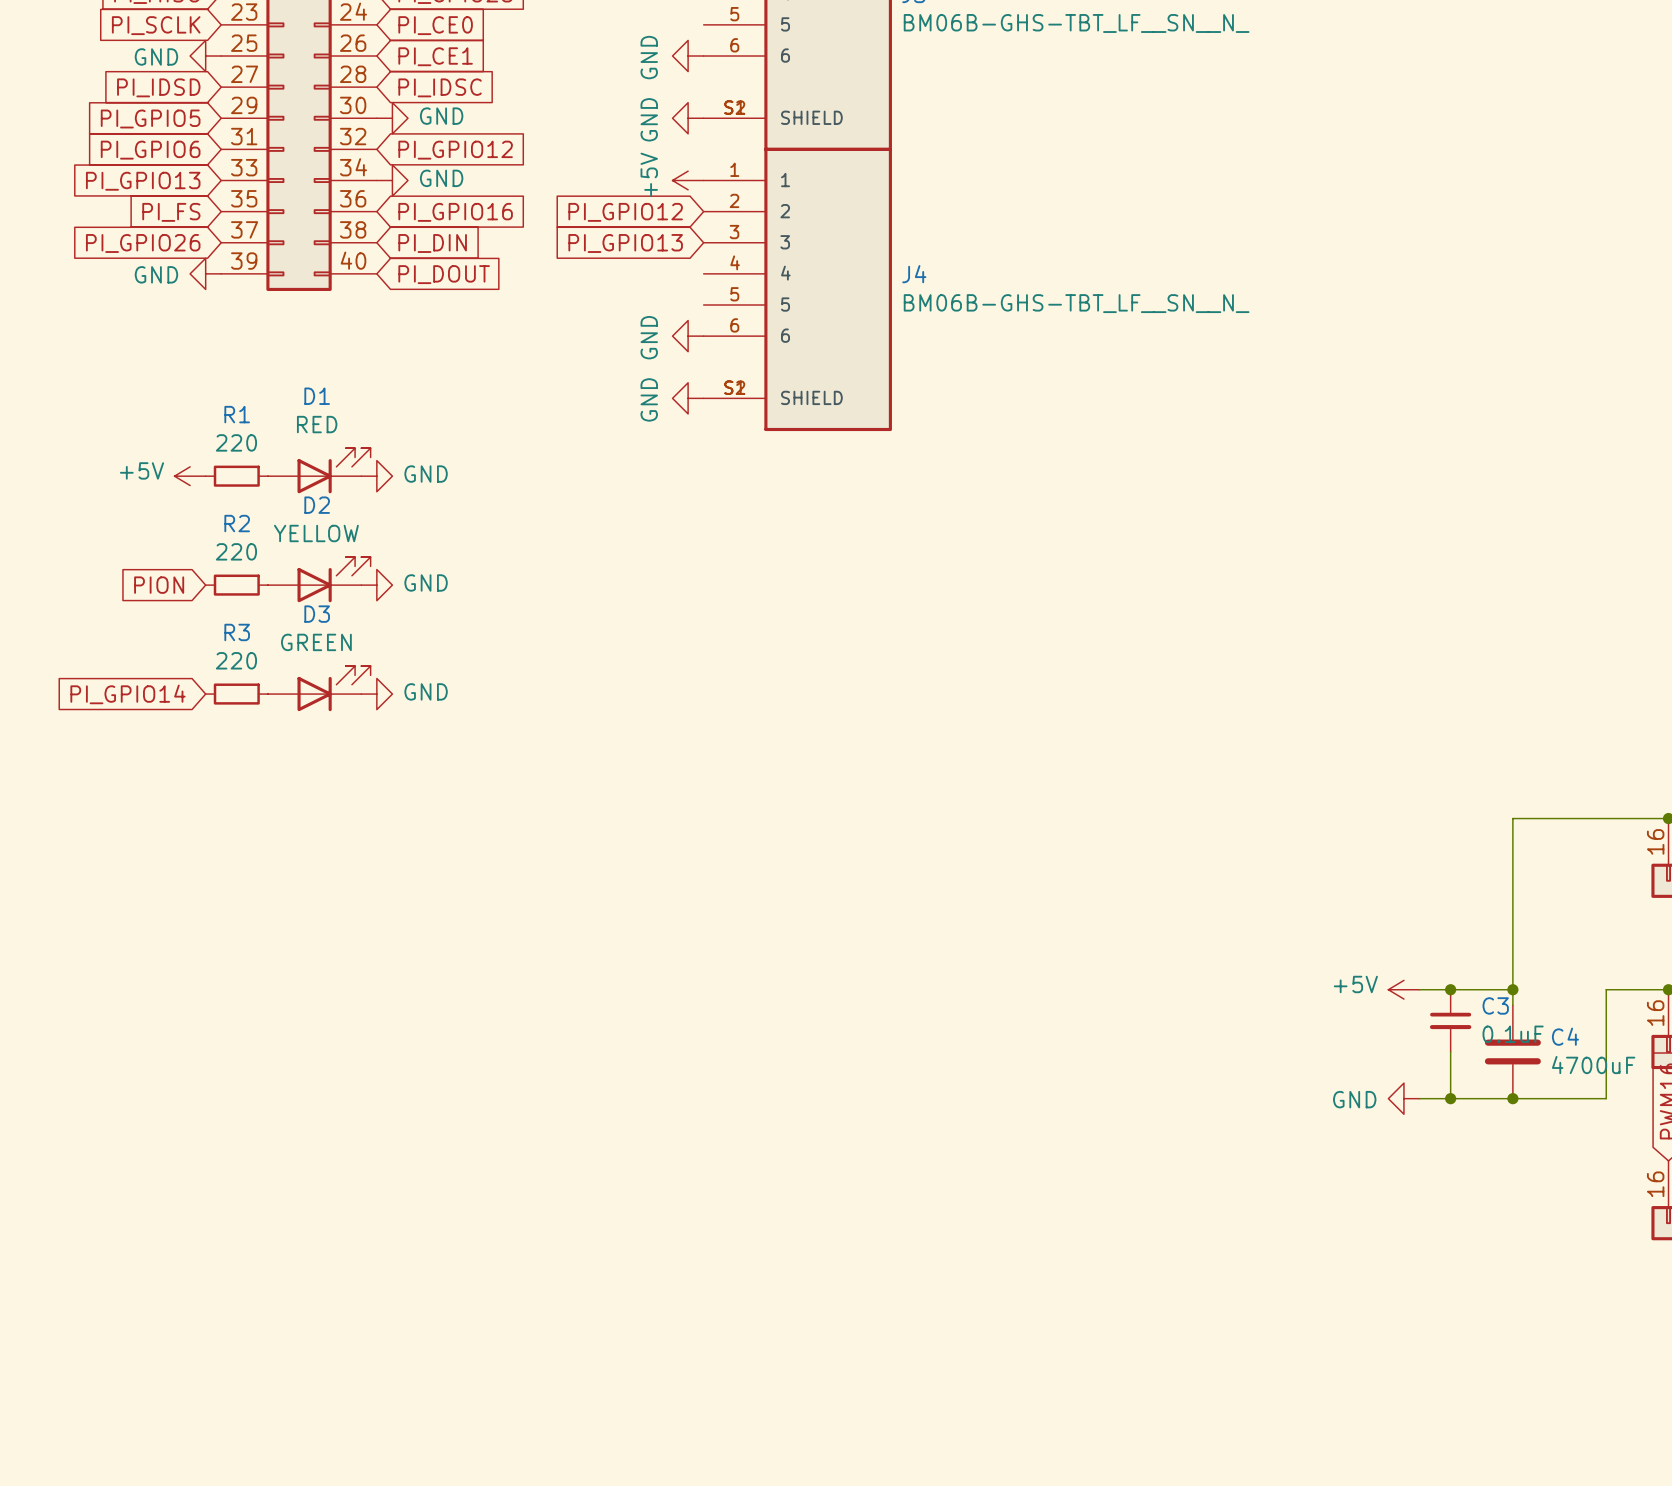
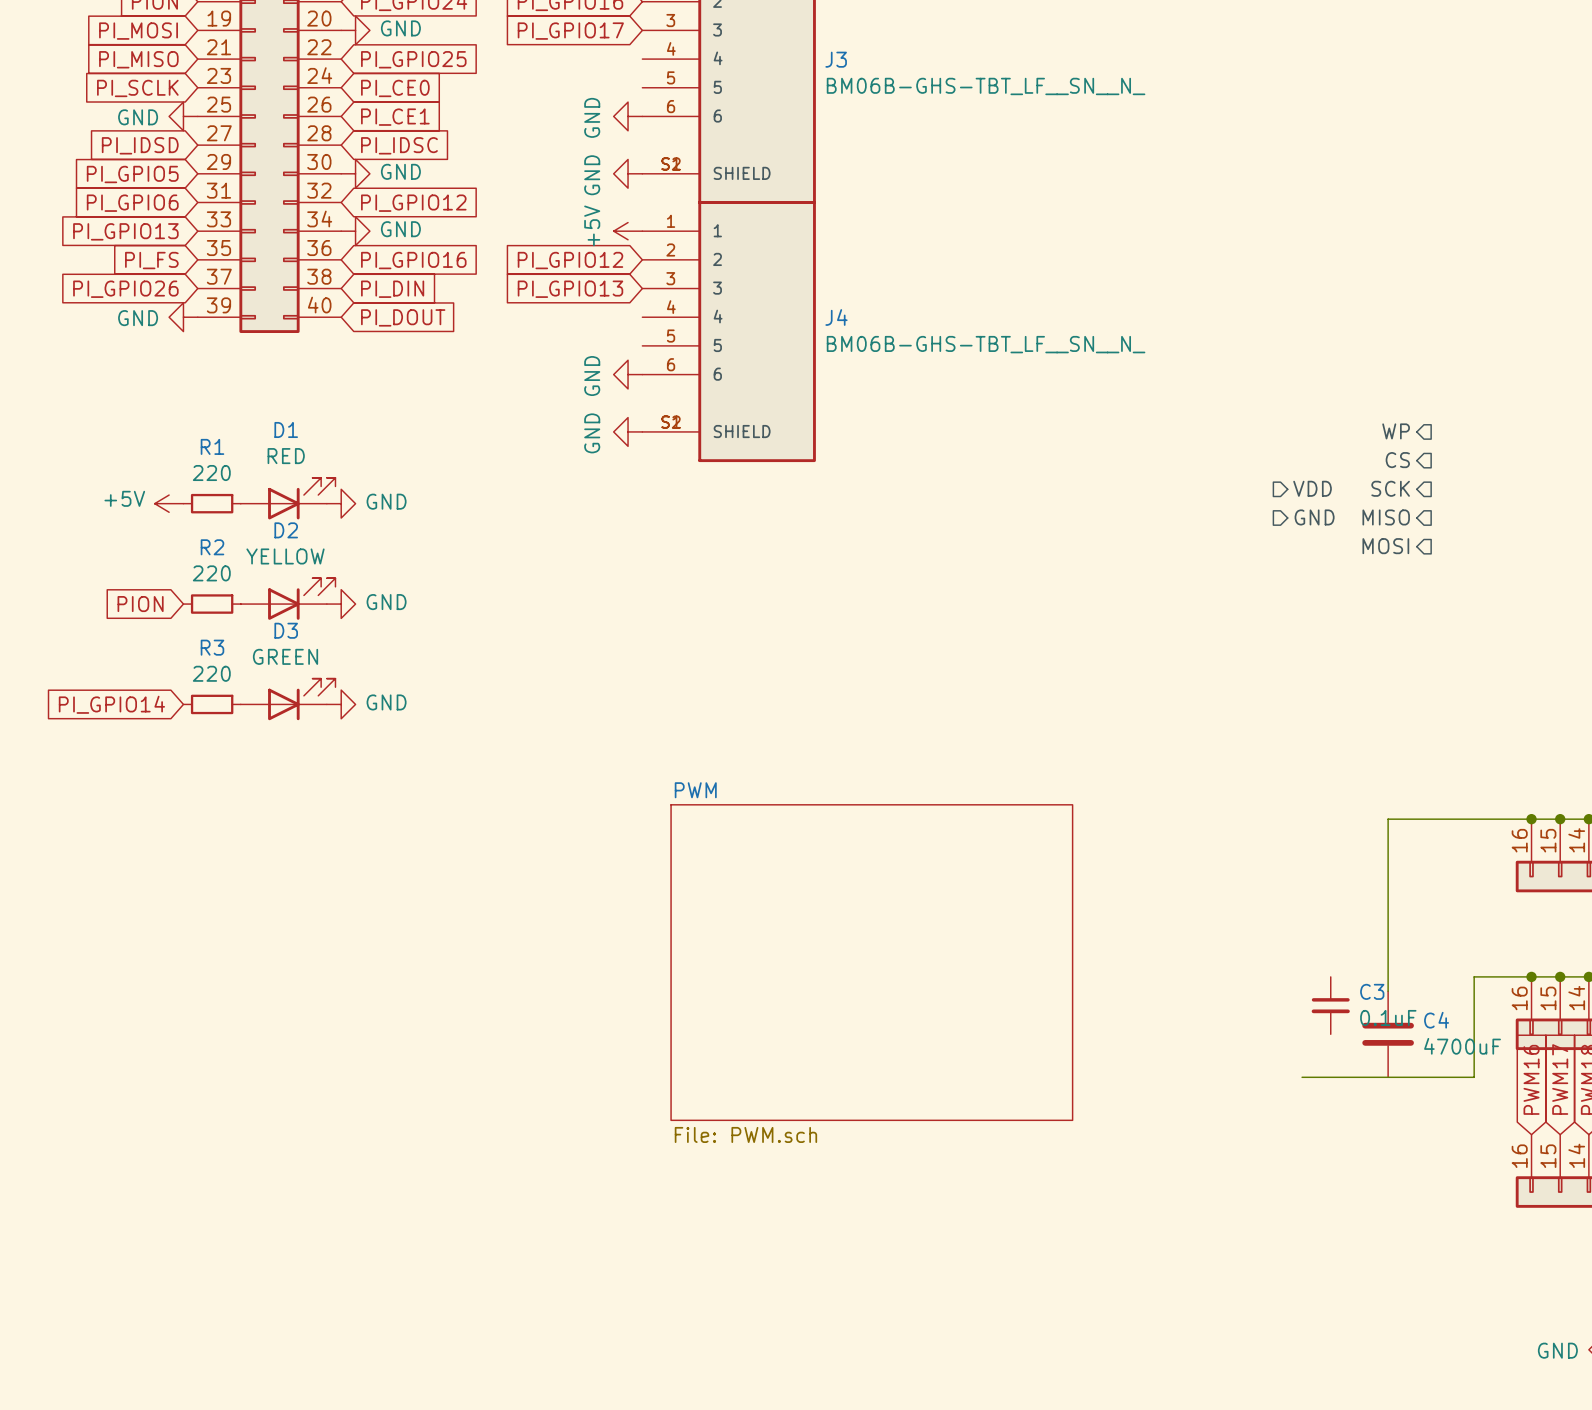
sheet pin: none -> WP (1396, 431)
sheet pin: none -> CS (1397, 460)
sheet pin: none -> VDD (1312, 488)
sheet pin: none -> SCK (1390, 488)
sheet pin: none -> GND (1314, 517)
sheet pin: none -> MISO (1386, 517)
sheet pin: none -> MOSI (1385, 546)
sheet PWM: none -> File: PWM.sch (871, 962)
power symbol: +5V (1403, 989) -> none
wire: (1419, 989) (1512, 989) -> none
junction: (1450, 989) -> none
junction: (1512, 989) -> none
wire: (1450, 1051) (1450, 1098) -> none
power symbol: GND (1403, 1098) -> none
junction: (1450, 1098) -> none
junction: (1512, 1098) -> none

